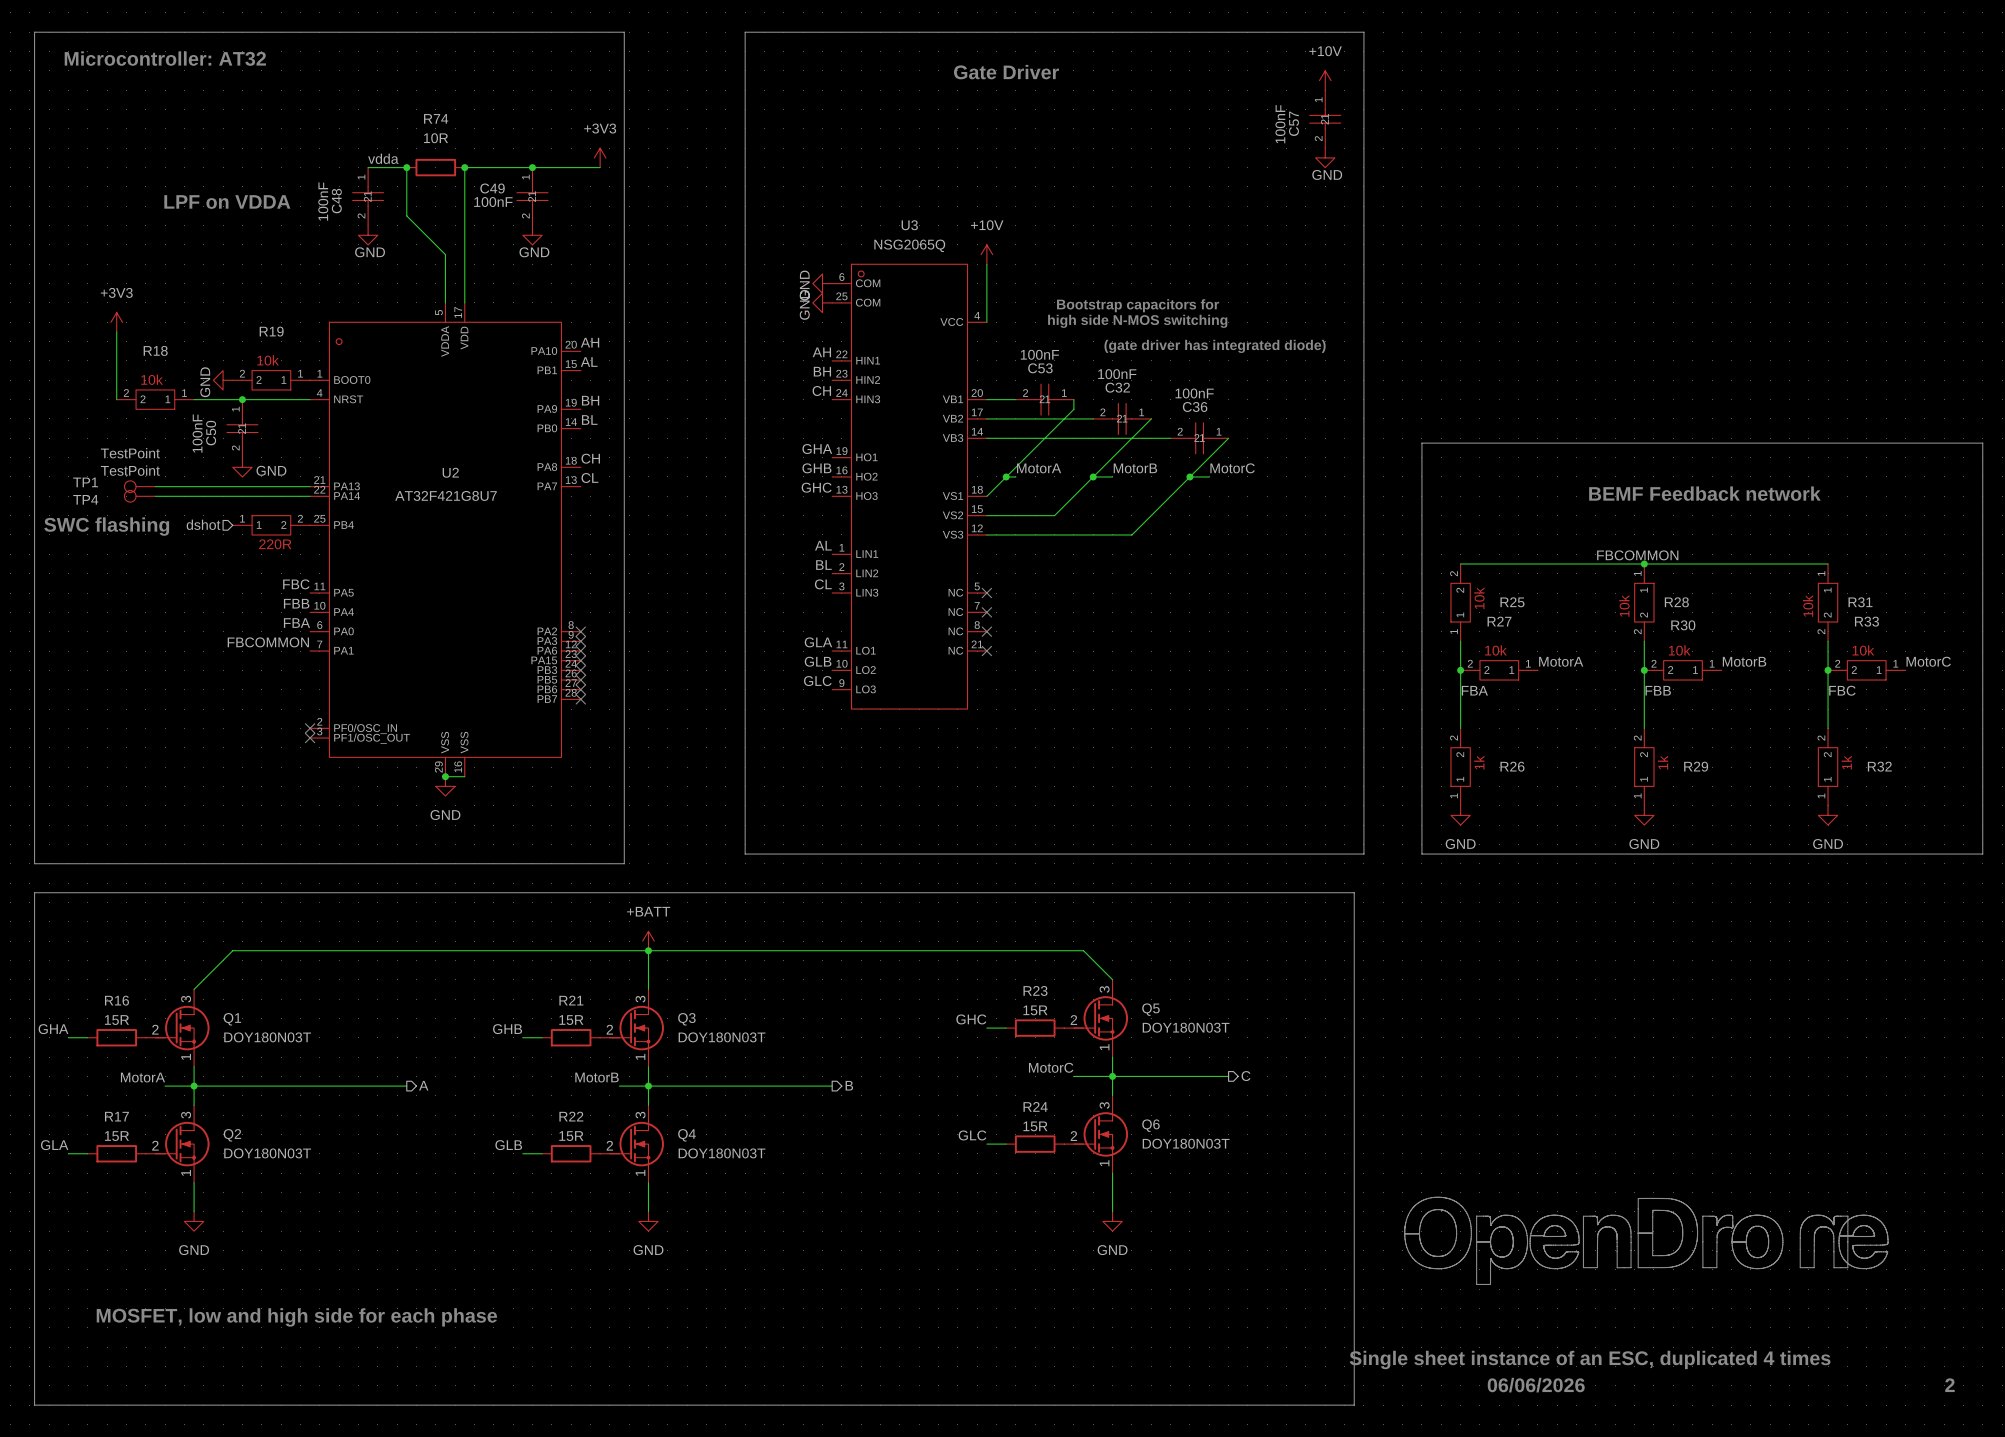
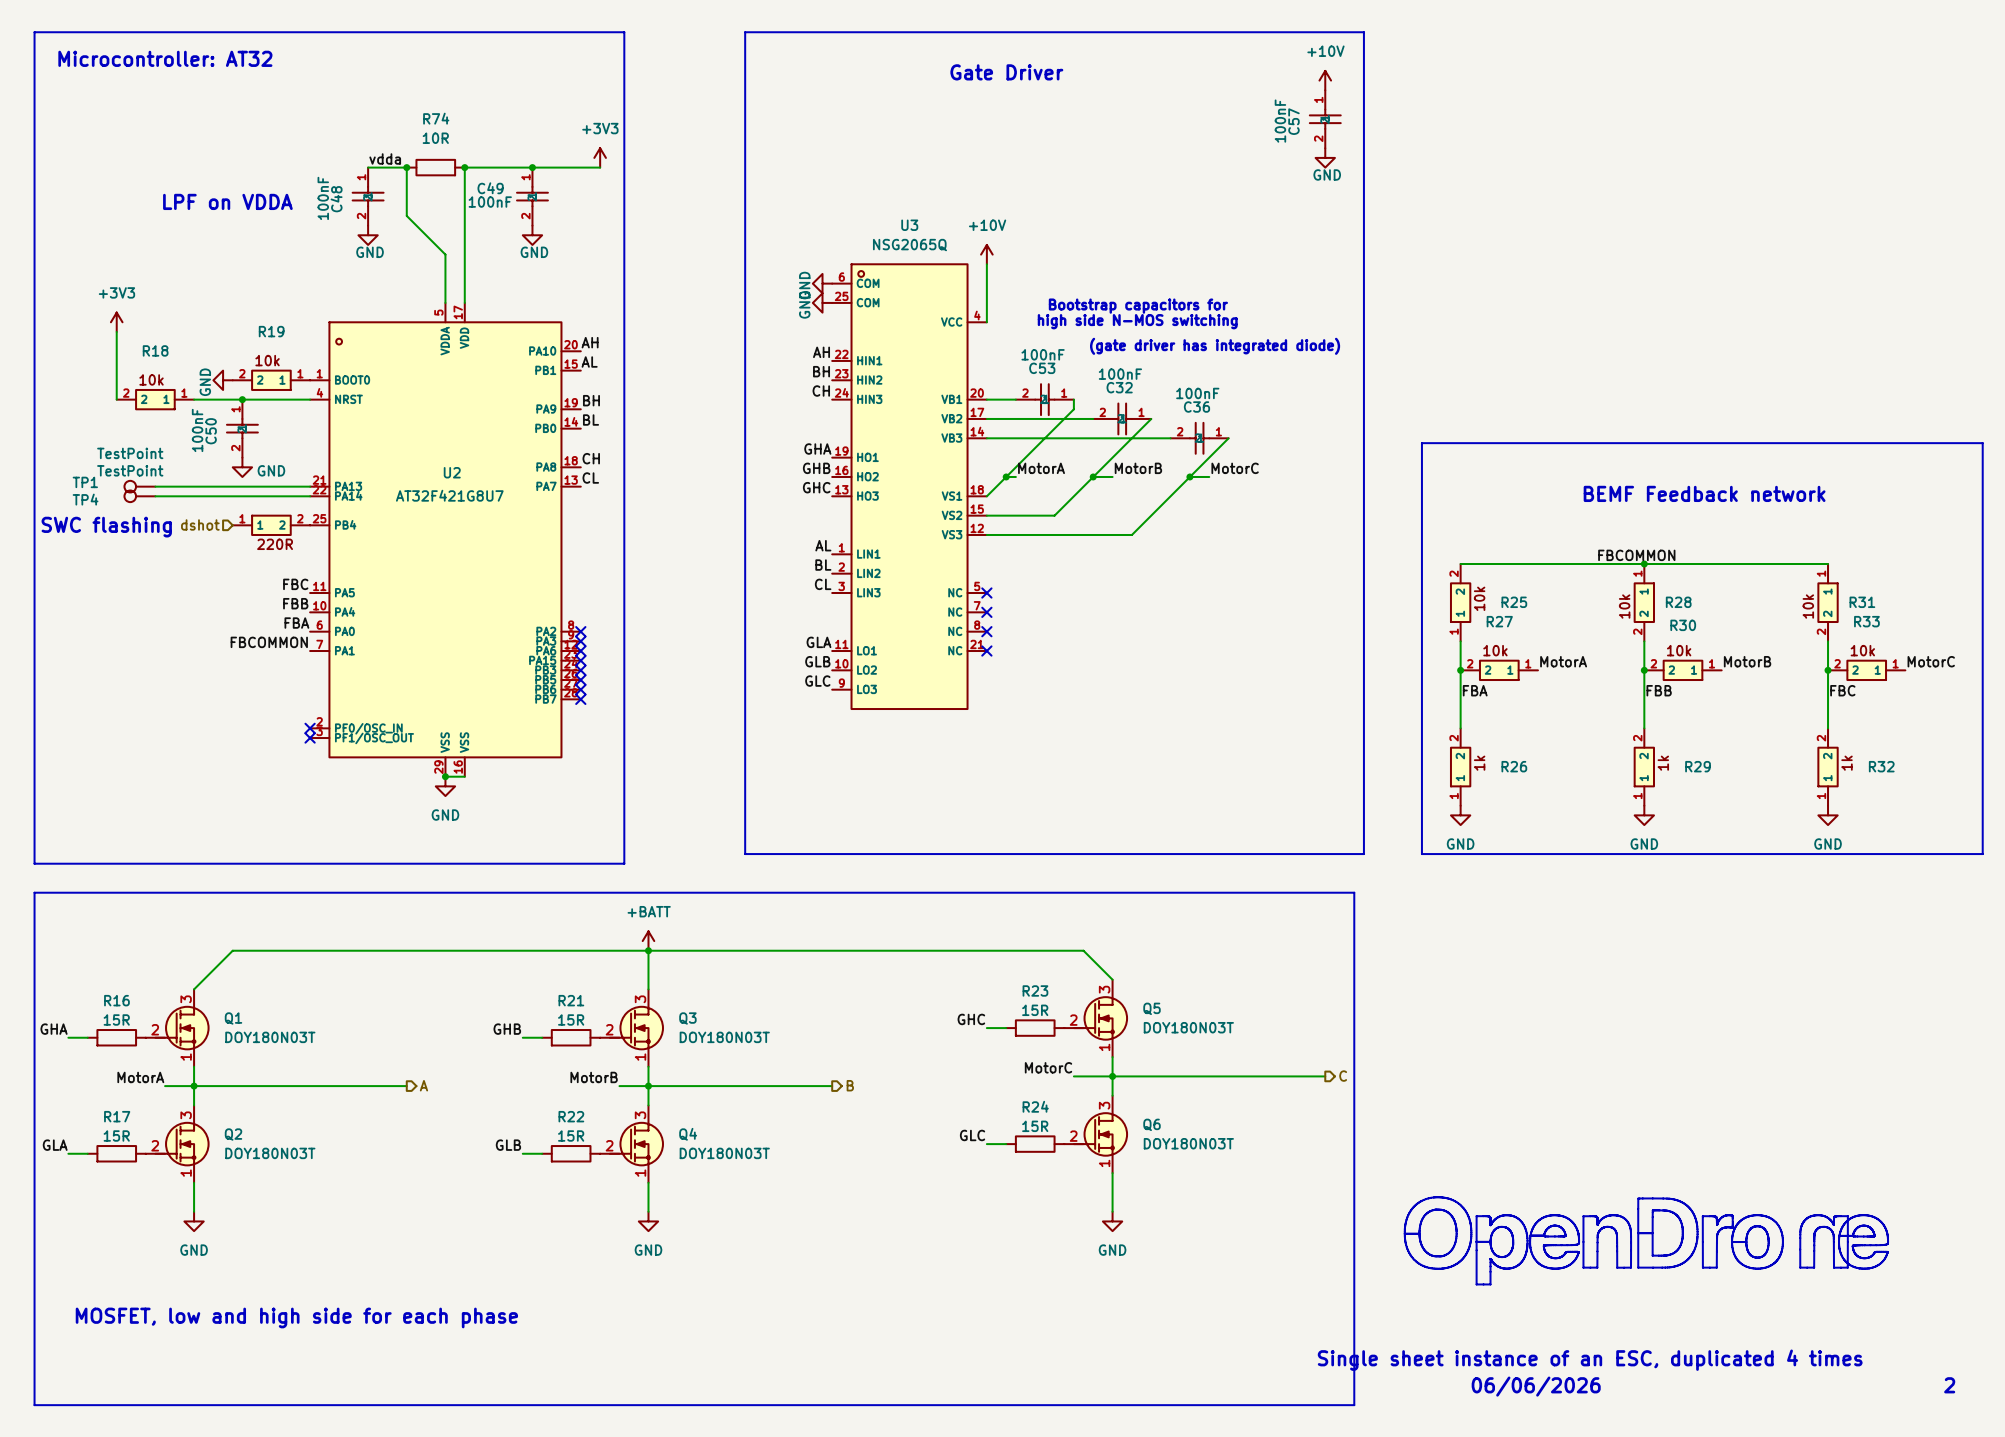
wire: none -> (1228, 1076) (1325, 1076)
hierarchical label position: C (1246, 1076) -> C (1343, 1076)

